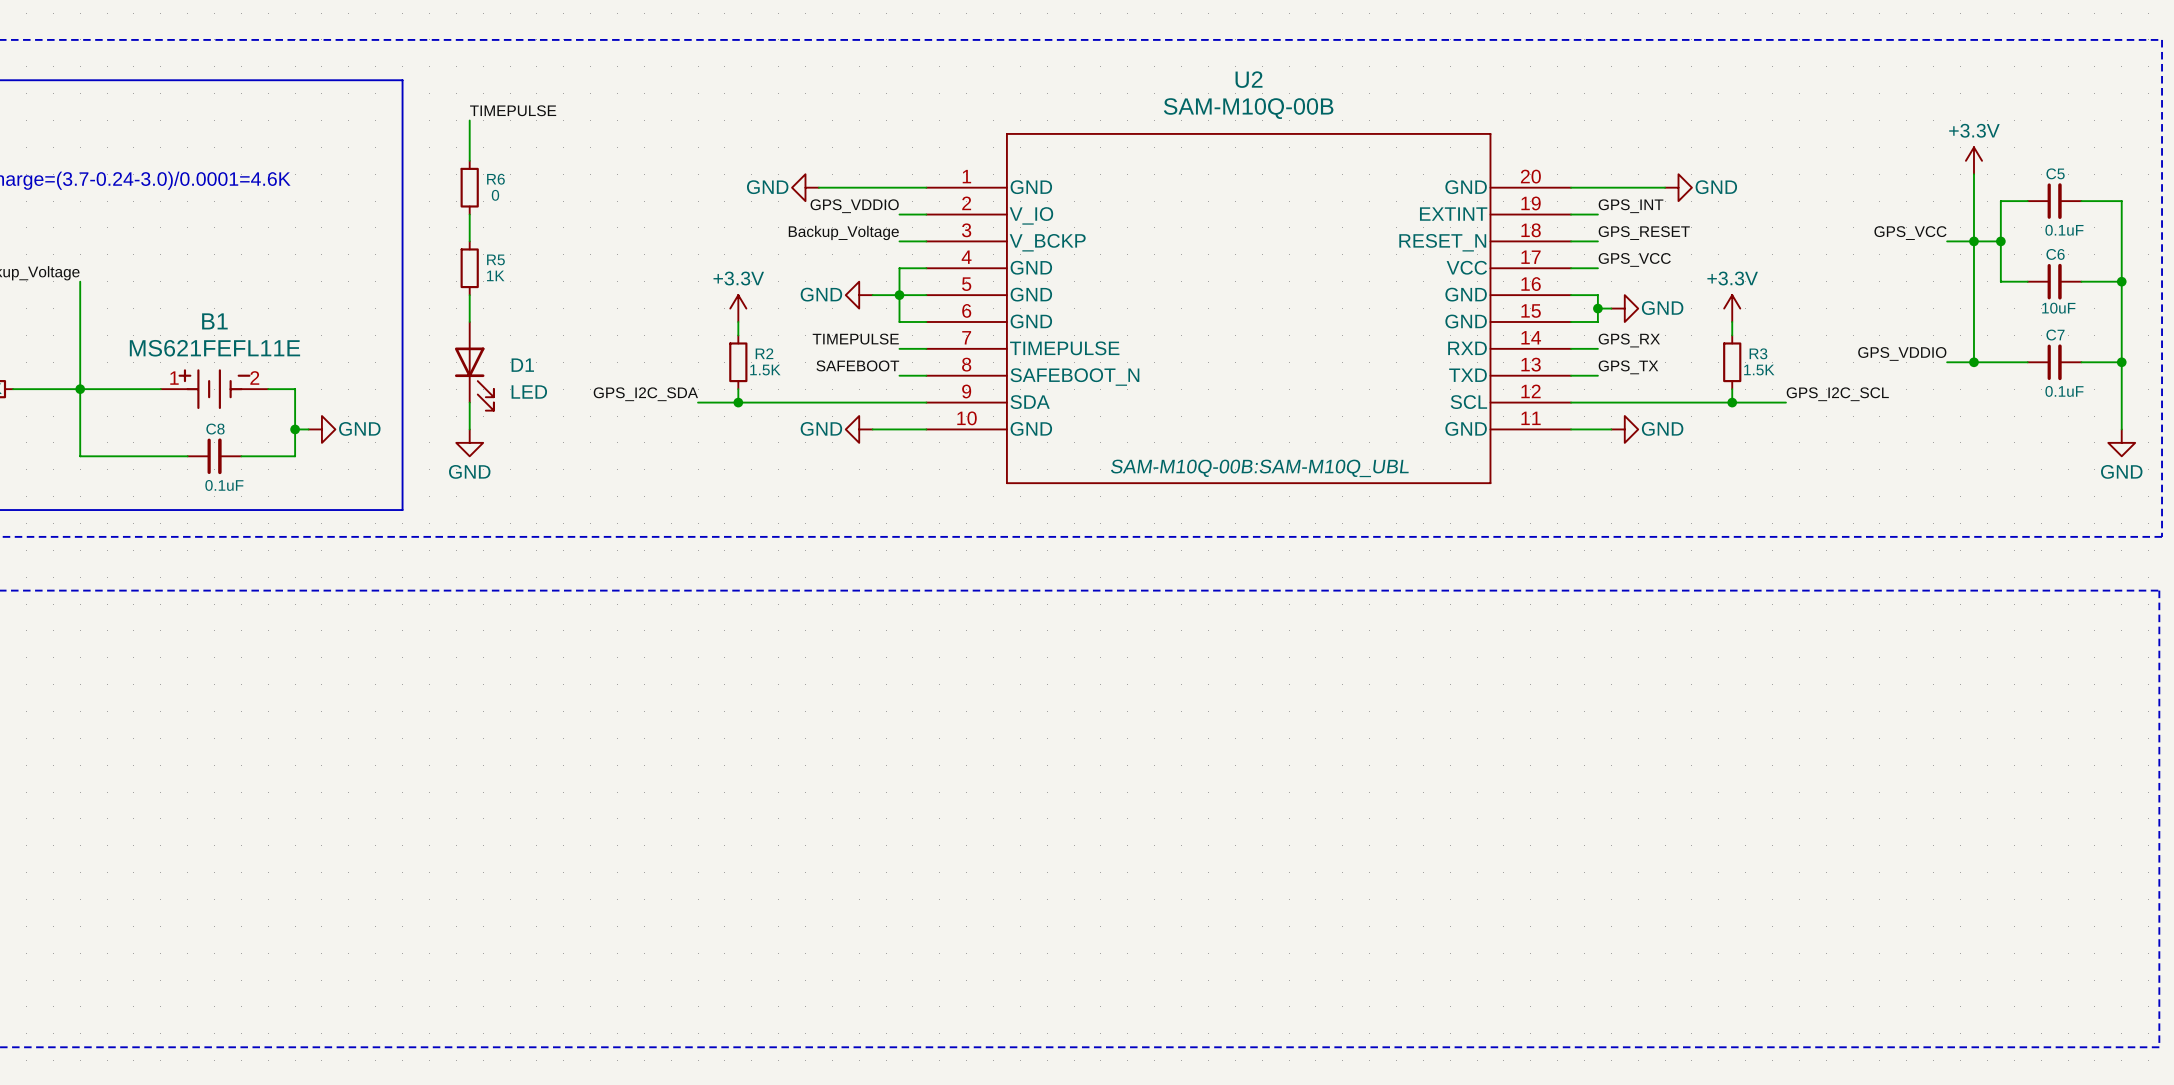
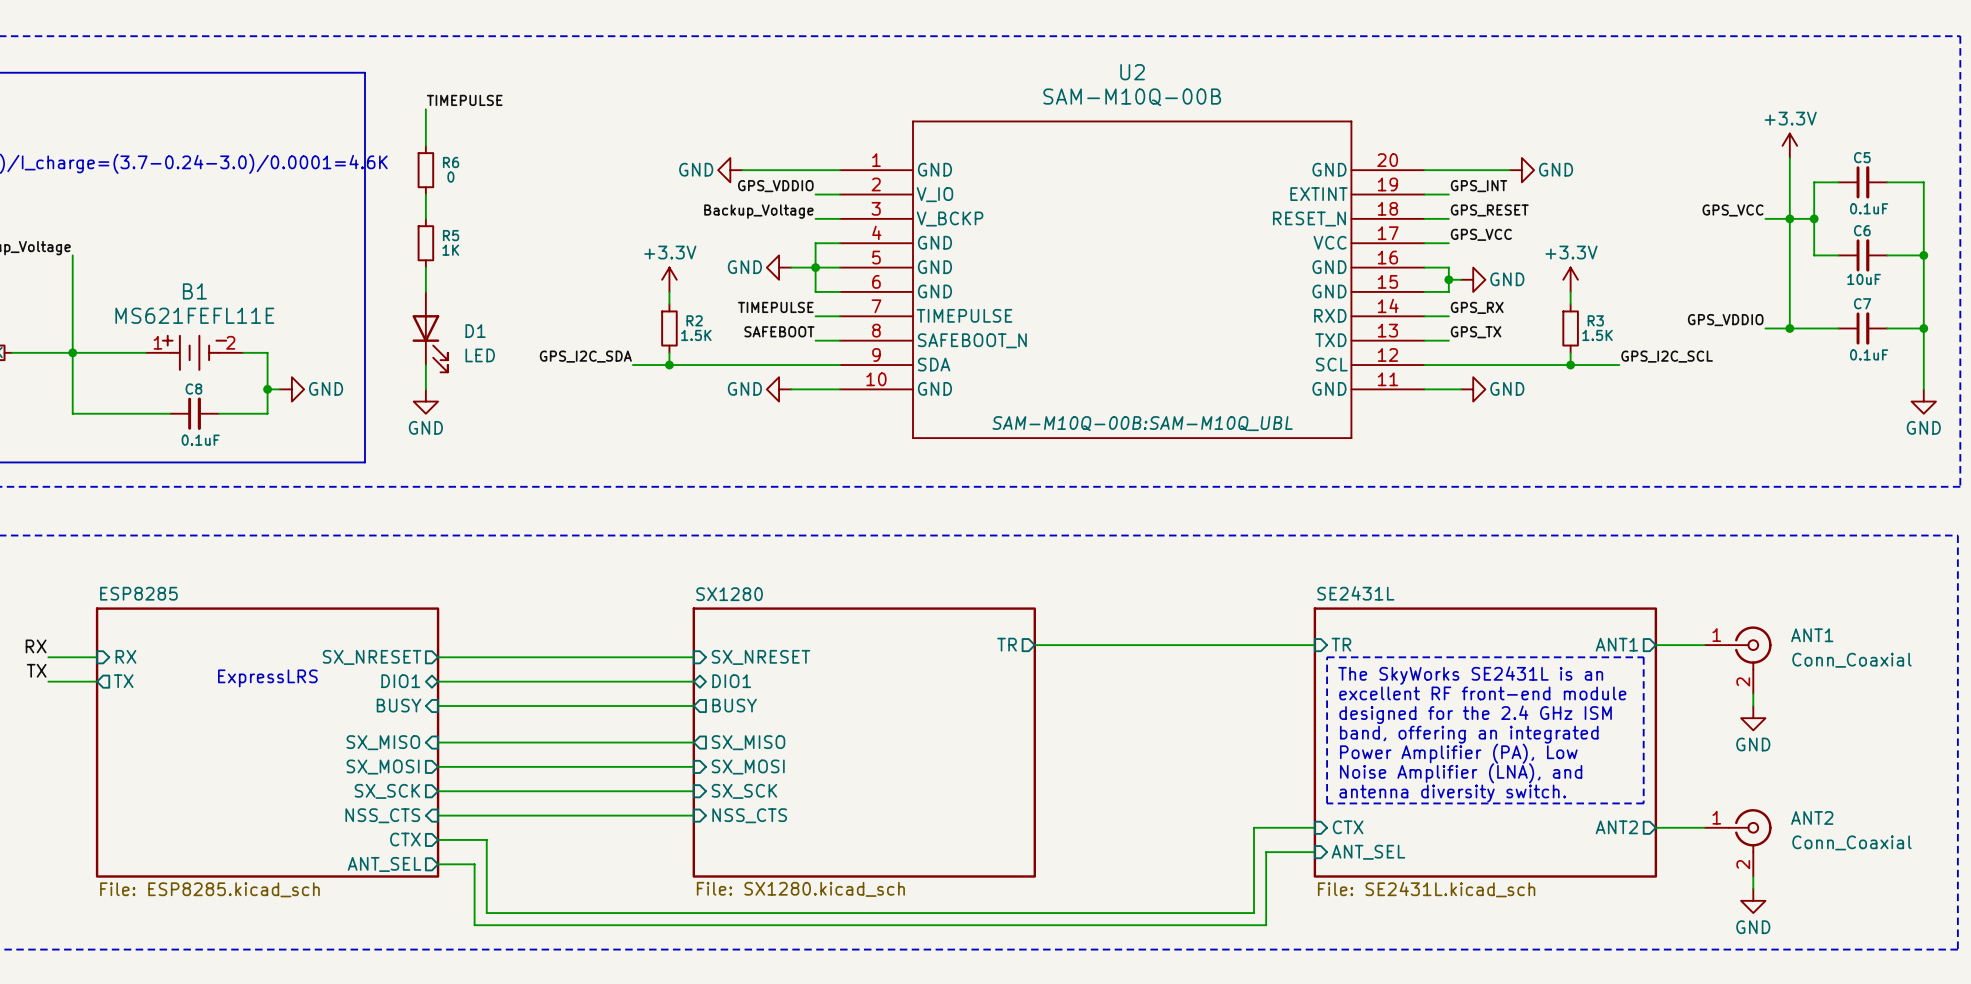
sheet pin: none -> TR (1007, 644)
sheet pin: none -> TR (1341, 644)
sheet pin: none -> ANT1 (1616, 644)
wire: none -> (1034, 645) (1314, 645)
wire: none -> (1655, 645) (1704, 645)
label: none -> RX (36, 646)
wire: none -> (48, 657) (97, 657)
sheet pin: none -> RX (125, 656)
wire: none -> (438, 657) (693, 657)
line: none -> (1327, 657) (1643, 657) (1643, 803) (1327, 803) (1327, 657)
sheet pin: none -> SX_NRESET (372, 657)
sheet pin: none -> SX_NRESET (760, 657)
ANT1: none -> Conn_Coaxial (1738, 660)
label: none -> TX (36, 670)
text: none -> The SkyWorks SE2431L is an (1470, 675)
text: none -> ExpressLRS (267, 678)
wire: none -> (48, 681) (97, 681)
sheet pin: none -> TX (123, 681)
sheet pin: none -> DIO1 (400, 681)
wire: none -> (438, 681) (693, 681)
sheet pin: none -> DIO1 (731, 681)
text: none -> excellent RF front-end module (1482, 693)
wire: none -> (1753, 693) (1753, 706)
sheet pin: none -> BUSY (399, 705)
wire: none -> (438, 706) (693, 706)
sheet pin: none -> BUSY (734, 705)
text: none -> designed for the 2.4 GHz ISM (1475, 714)
power symbol: none -> GND (1753, 718)
text: none -> band, offering an integrated (1469, 734)
sheet ESP8285: none -> File: ESP8285.kicad_sch (267, 742)
wire: none -> (438, 742) (693, 742)
sheet SX1280: none -> File: SX1280.kicad_sch (864, 742)
sheet SE2431L: none -> File: SE2431L.kicad_sch (1485, 742)
sheet pin: none -> SX_MISO (383, 742)
sheet pin: none -> SX_MISO (748, 742)
text: none -> Power Amplifier (PA), Low (1458, 753)
wire: none -> (438, 766) (693, 766)
sheet pin: none -> SX_MOSI (383, 767)
sheet pin: none -> SX_MOSI (748, 767)
text: none -> Noise Amplifier (LNA), and (1461, 773)
wire: none -> (438, 791) (693, 791)
sheet pin: none -> SX_SCK (387, 791)
sheet pin: none -> SX_SCK (744, 791)
text: none -> antenna diversity switch. (1452, 793)
wire: none -> (438, 815) (693, 815)
sheet pin: none -> NSS_CTS (382, 815)
sheet pin: none -> NSS_CTS (749, 815)
wire: none -> (1314, 827) (1253, 827) (1253, 913) (486, 913) (486, 839) (438, 839)
sheet pin: none -> CTX (1348, 827)
sheet pin: none -> ANT2 (1616, 827)
wire: none -> (1655, 827) (1704, 827)
sheet pin: none -> CTX (405, 839)
ANT2: none -> Conn_Coaxial (1738, 842)
wire: none -> (1314, 852) (1266, 852) (1266, 925) (474, 925) (474, 864) (438, 864)
sheet pin: none -> ANT_SEL (1368, 852)
sheet pin: none -> ANT_SEL (384, 864)
wire: none -> (1753, 876) (1753, 888)
power symbol: none -> GND (1753, 900)

